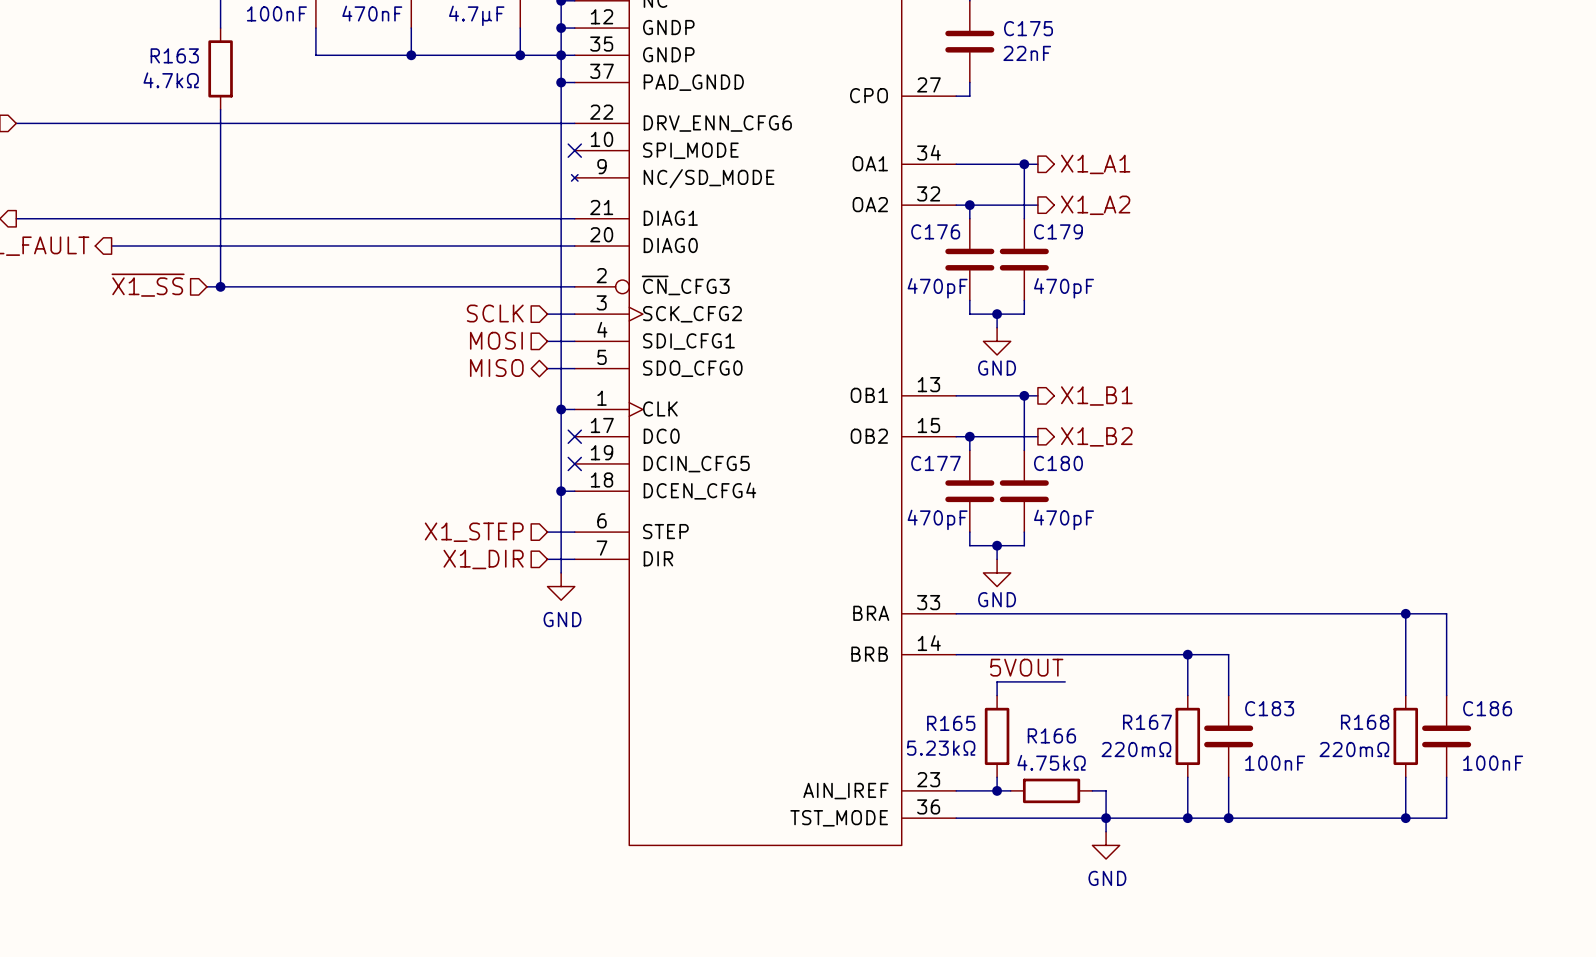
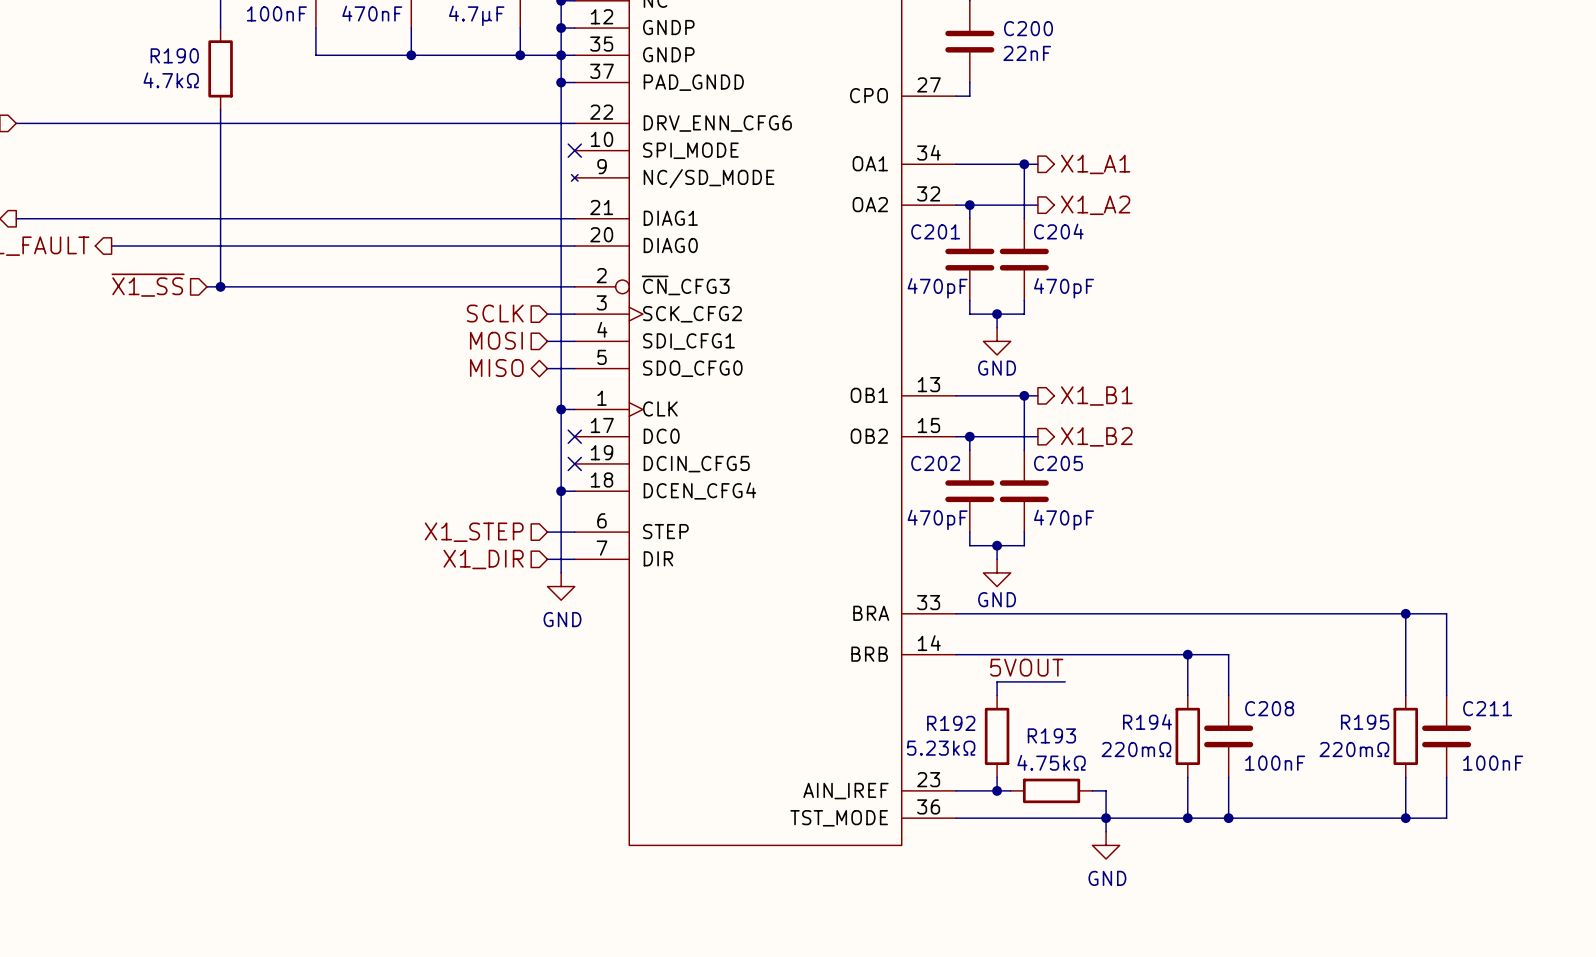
C175 name: C175 (1028, 28) -> C200 (1028, 28)
R163 name: R163 (174, 55) -> R190 (174, 55)
C176 name: C176 (935, 231) -> C201 (935, 231)
C179 name: C179 (1058, 231) -> C204 (1058, 231)
C177 name: C177 (935, 463) -> C202 (935, 463)
C180 name: C180 (1058, 463) -> C205 (1058, 463)
C183 name: C183 (1269, 708) -> C208 (1269, 708)
C186 name: C186 (1487, 708) -> C211 (1487, 708)
R167 name: R167 (1147, 722) -> R194 (1147, 721)
R168 name: R168 (1365, 722) -> R195 (1365, 722)
R165 name: R165 (951, 723) -> R192 (951, 723)
R166 name: R166 (1051, 735) -> R193 (1051, 735)

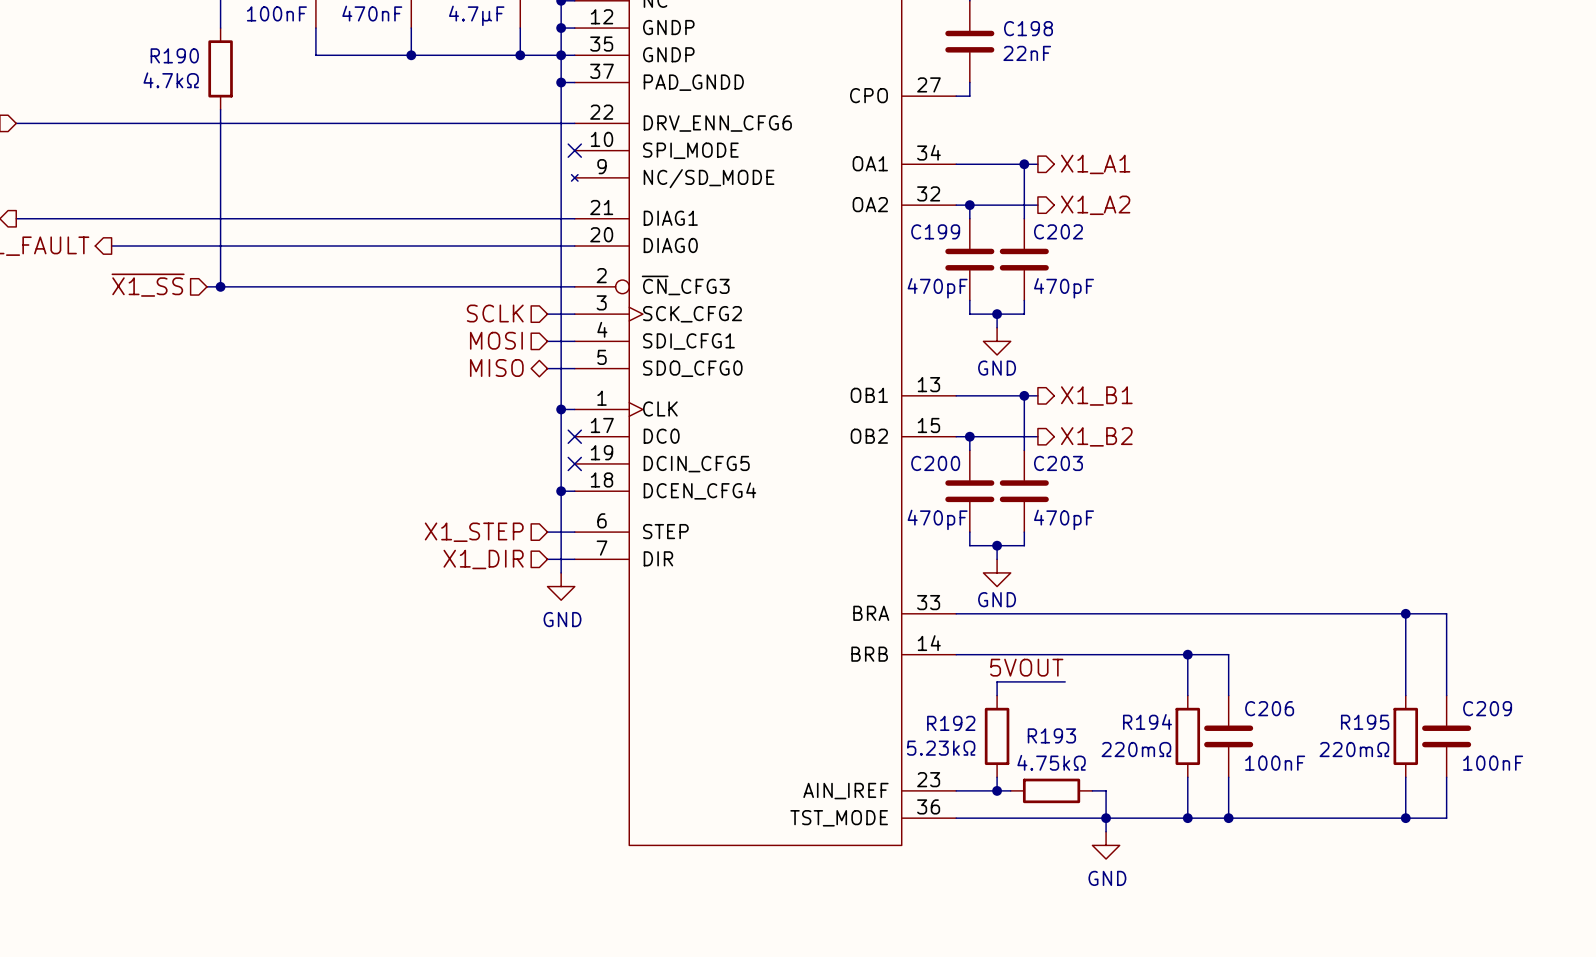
C200 name: C200 (1028, 28) -> C198 (1028, 28)
C201 name: C201 (935, 231) -> C199 (935, 231)
C204 name: C204 (1058, 231) -> C202 (1058, 231)
C202 name: C202 (935, 463) -> C200 (935, 463)
C205 name: C205 (1058, 463) -> C203 (1058, 463)
C208 name: C208 (1269, 708) -> C206 (1269, 708)
C211 name: C211 (1487, 708) -> C209 (1487, 708)

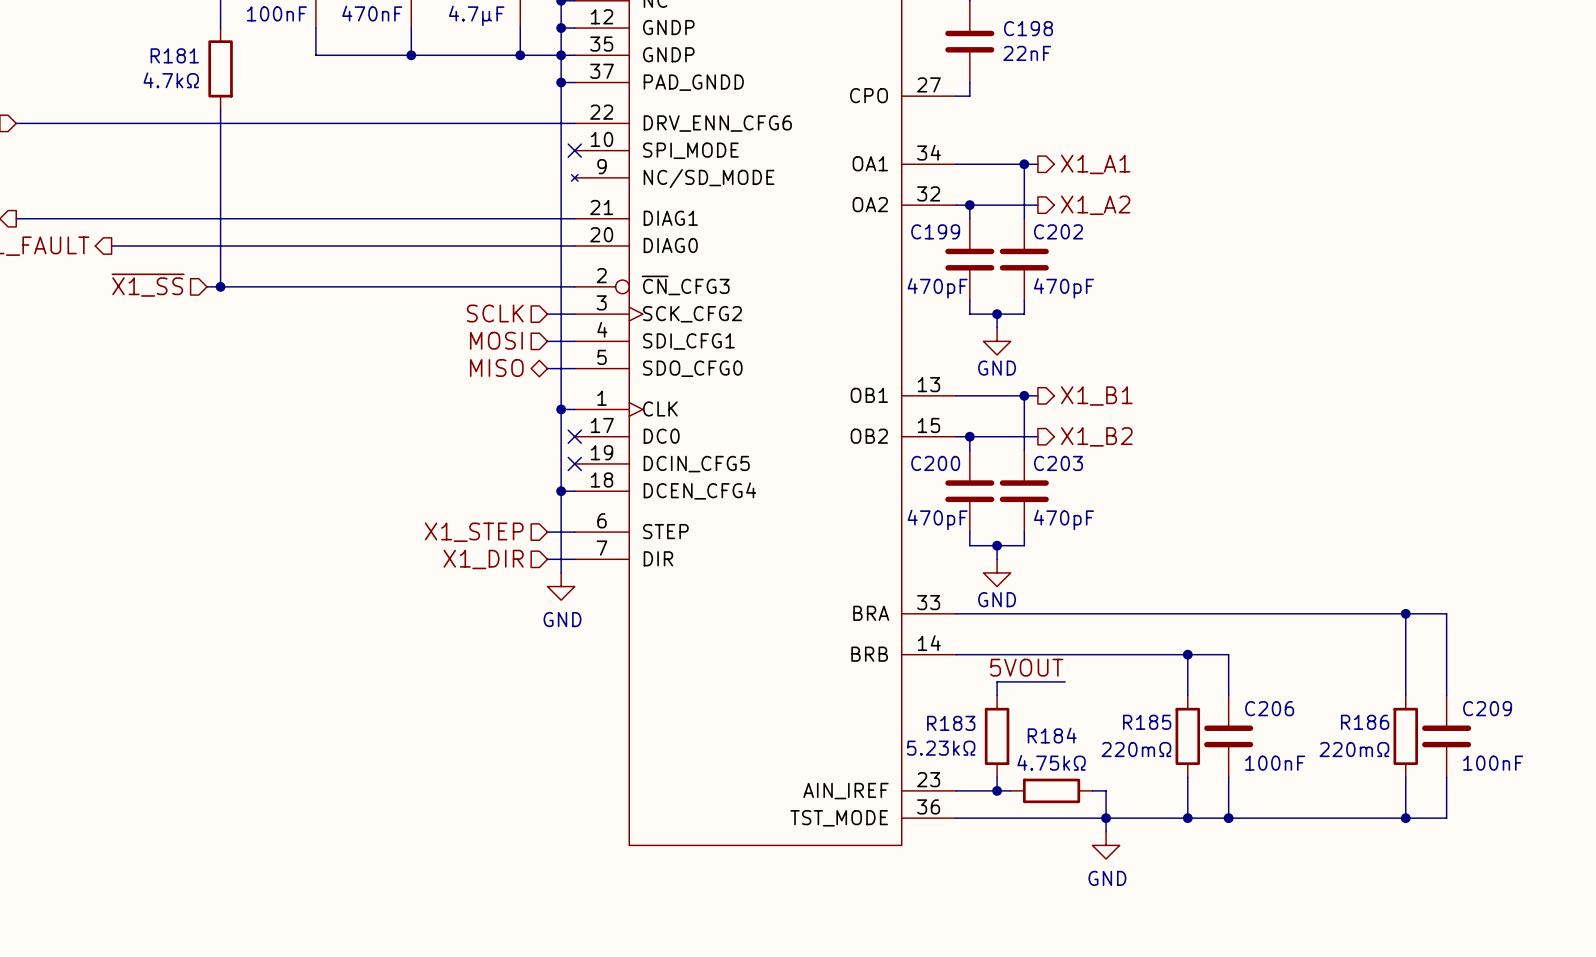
R190 name: R190 (174, 55) -> R181 (174, 55)
R194 name: R194 (1147, 721) -> R185 (1147, 722)
R195 name: R195 (1365, 722) -> R186 (1365, 722)
R192 name: R192 (951, 723) -> R183 (951, 723)
R193 name: R193 (1051, 735) -> R184 (1052, 735)

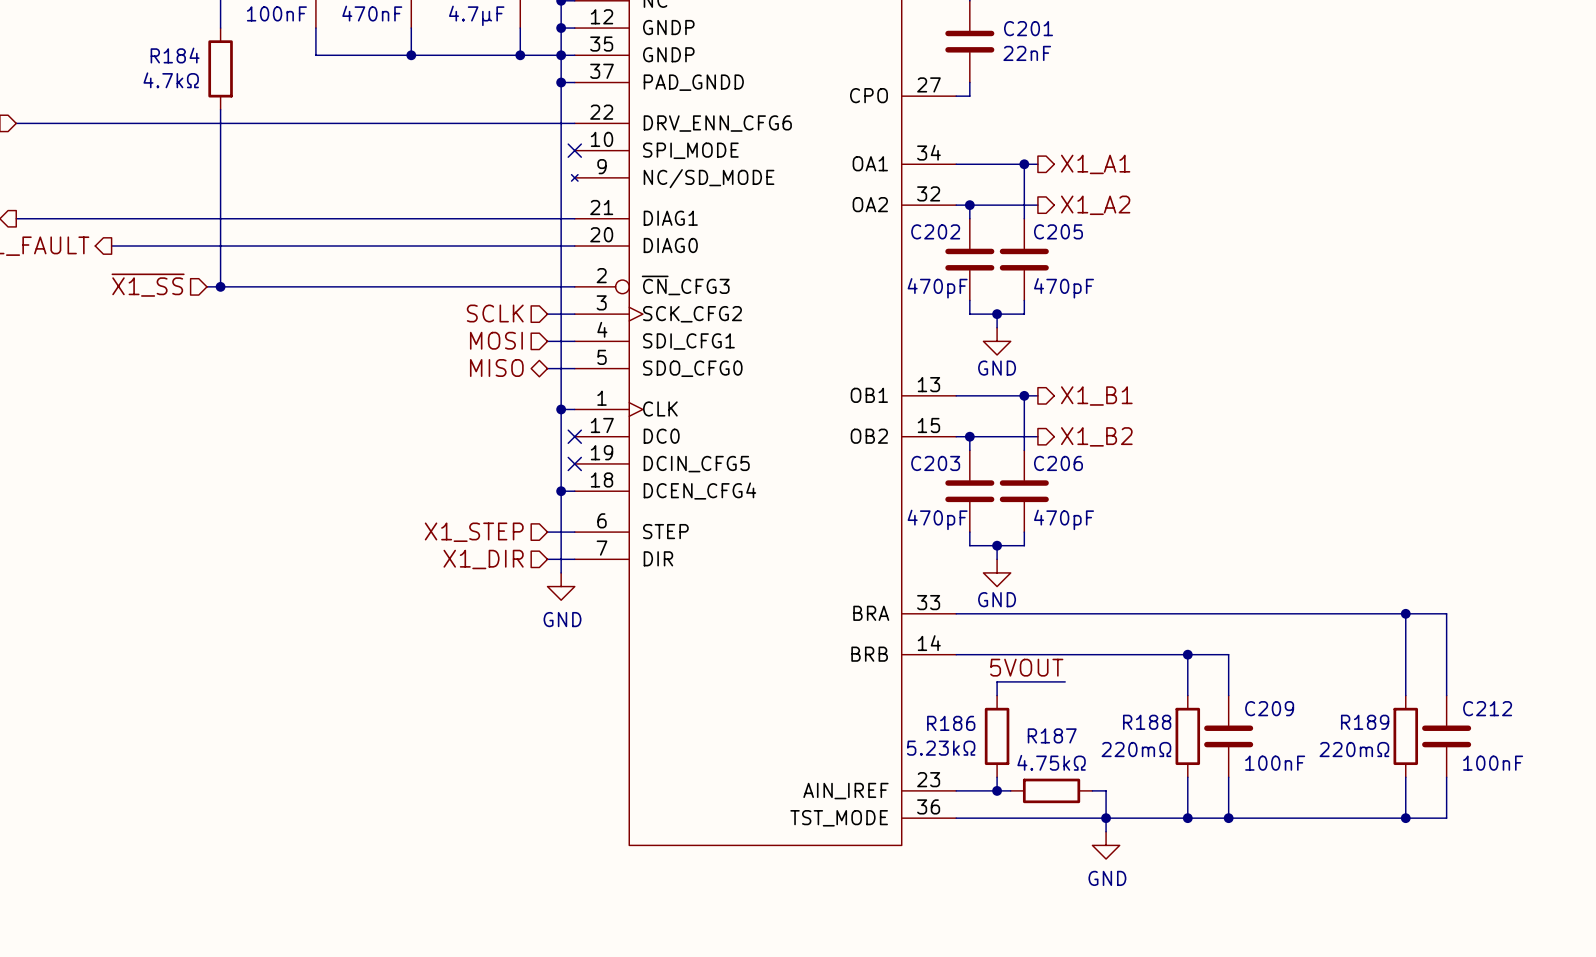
C198 name: C198 (1028, 28) -> C201 (1028, 28)
R181 name: R181 (174, 55) -> R184 (175, 55)
C199 name: C199 (935, 231) -> C202 (935, 231)
C202 name: C202 (1058, 231) -> C205 (1058, 231)
C200 name: C200 (935, 463) -> C203 (935, 463)
C203 name: C203 (1058, 463) -> C206 (1058, 463)
C206 name: C206 (1269, 708) -> C209 (1269, 708)
C209 name: C209 (1487, 708) -> C212 (1487, 708)
R185 name: R185 (1147, 722) -> R188 (1147, 722)
R186 name: R186 (1365, 722) -> R189 (1365, 722)
R183 name: R183 (951, 723) -> R186 (951, 723)
R184 name: R184 (1052, 735) -> R187 (1052, 735)

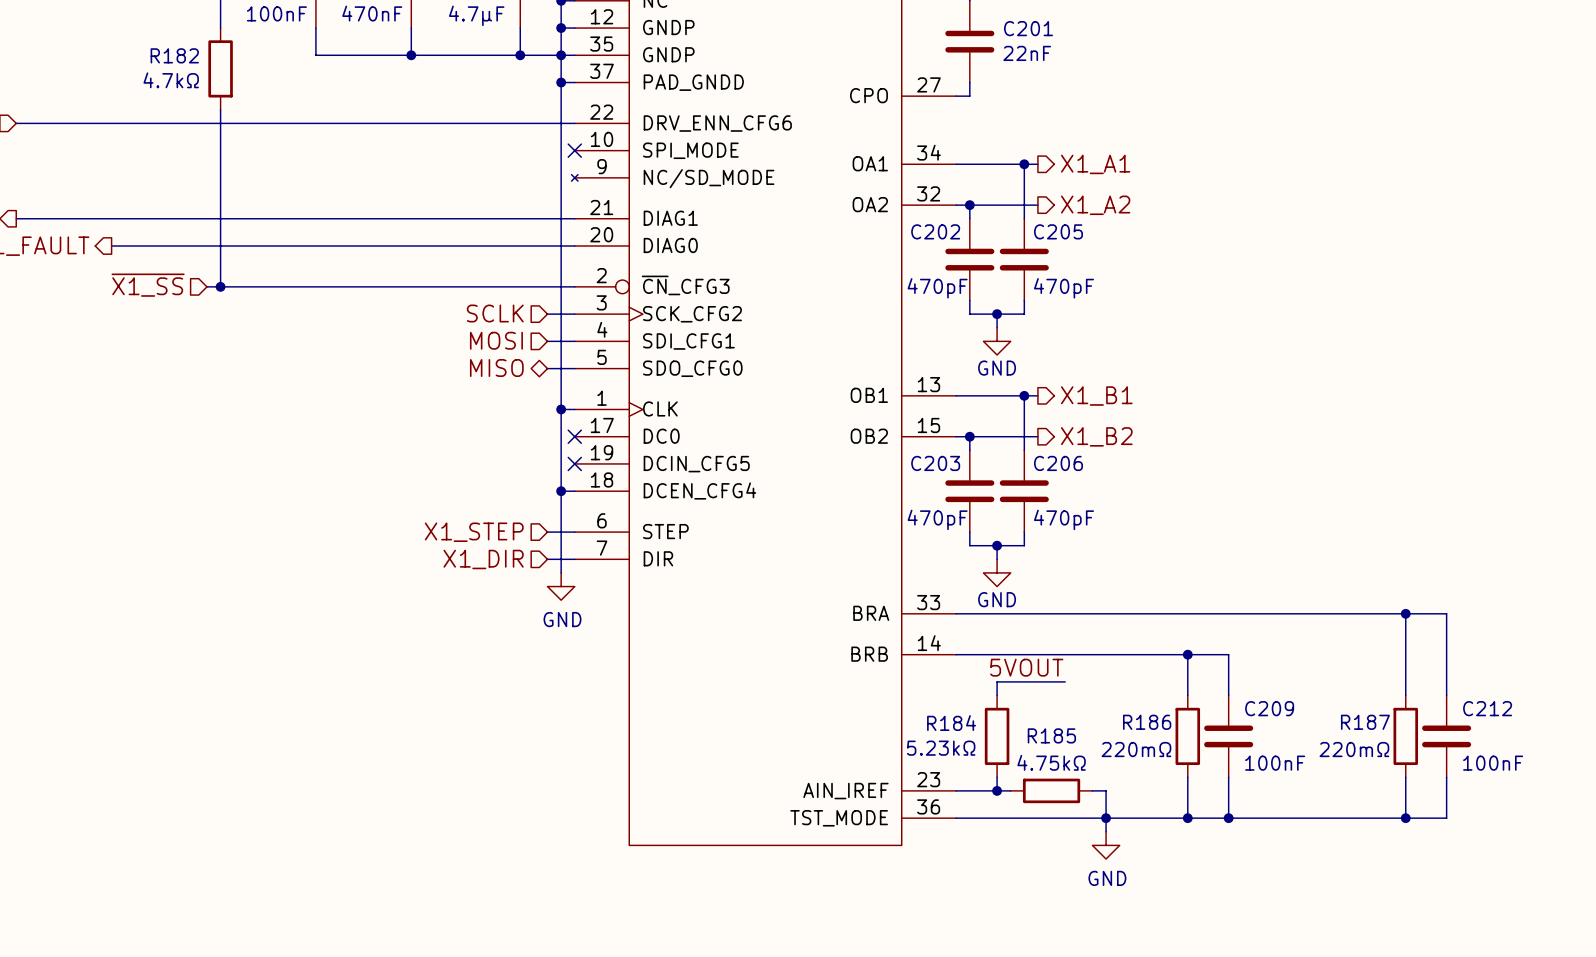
R184 name: R184 (175, 55) -> R182 (174, 55)
R188 name: R188 (1147, 722) -> R186 (1147, 722)
R189 name: R189 (1365, 722) -> R187 (1365, 722)
R186 name: R186 (951, 723) -> R184 (951, 723)
R187 name: R187 (1052, 735) -> R185 (1051, 735)

